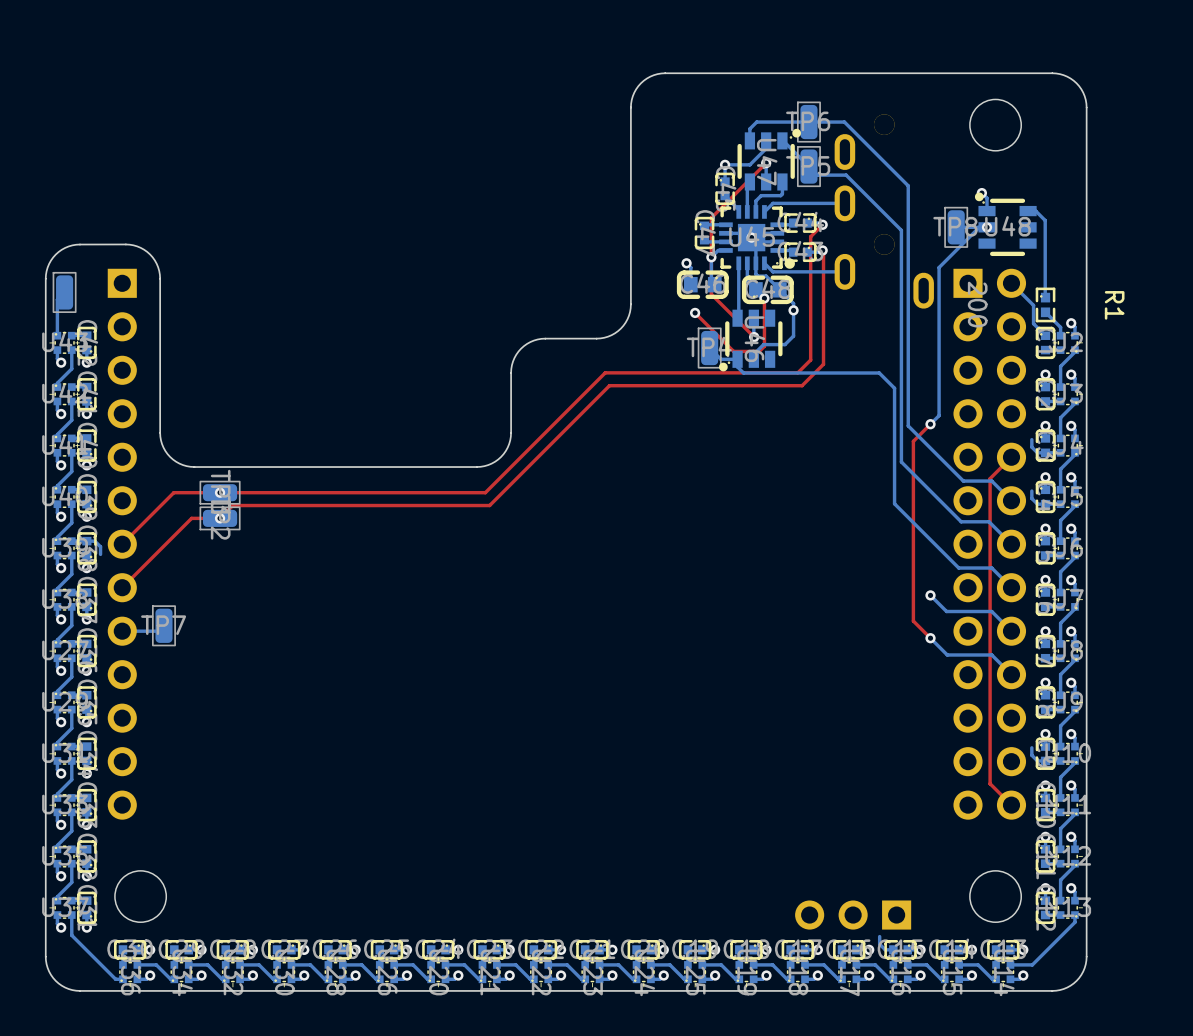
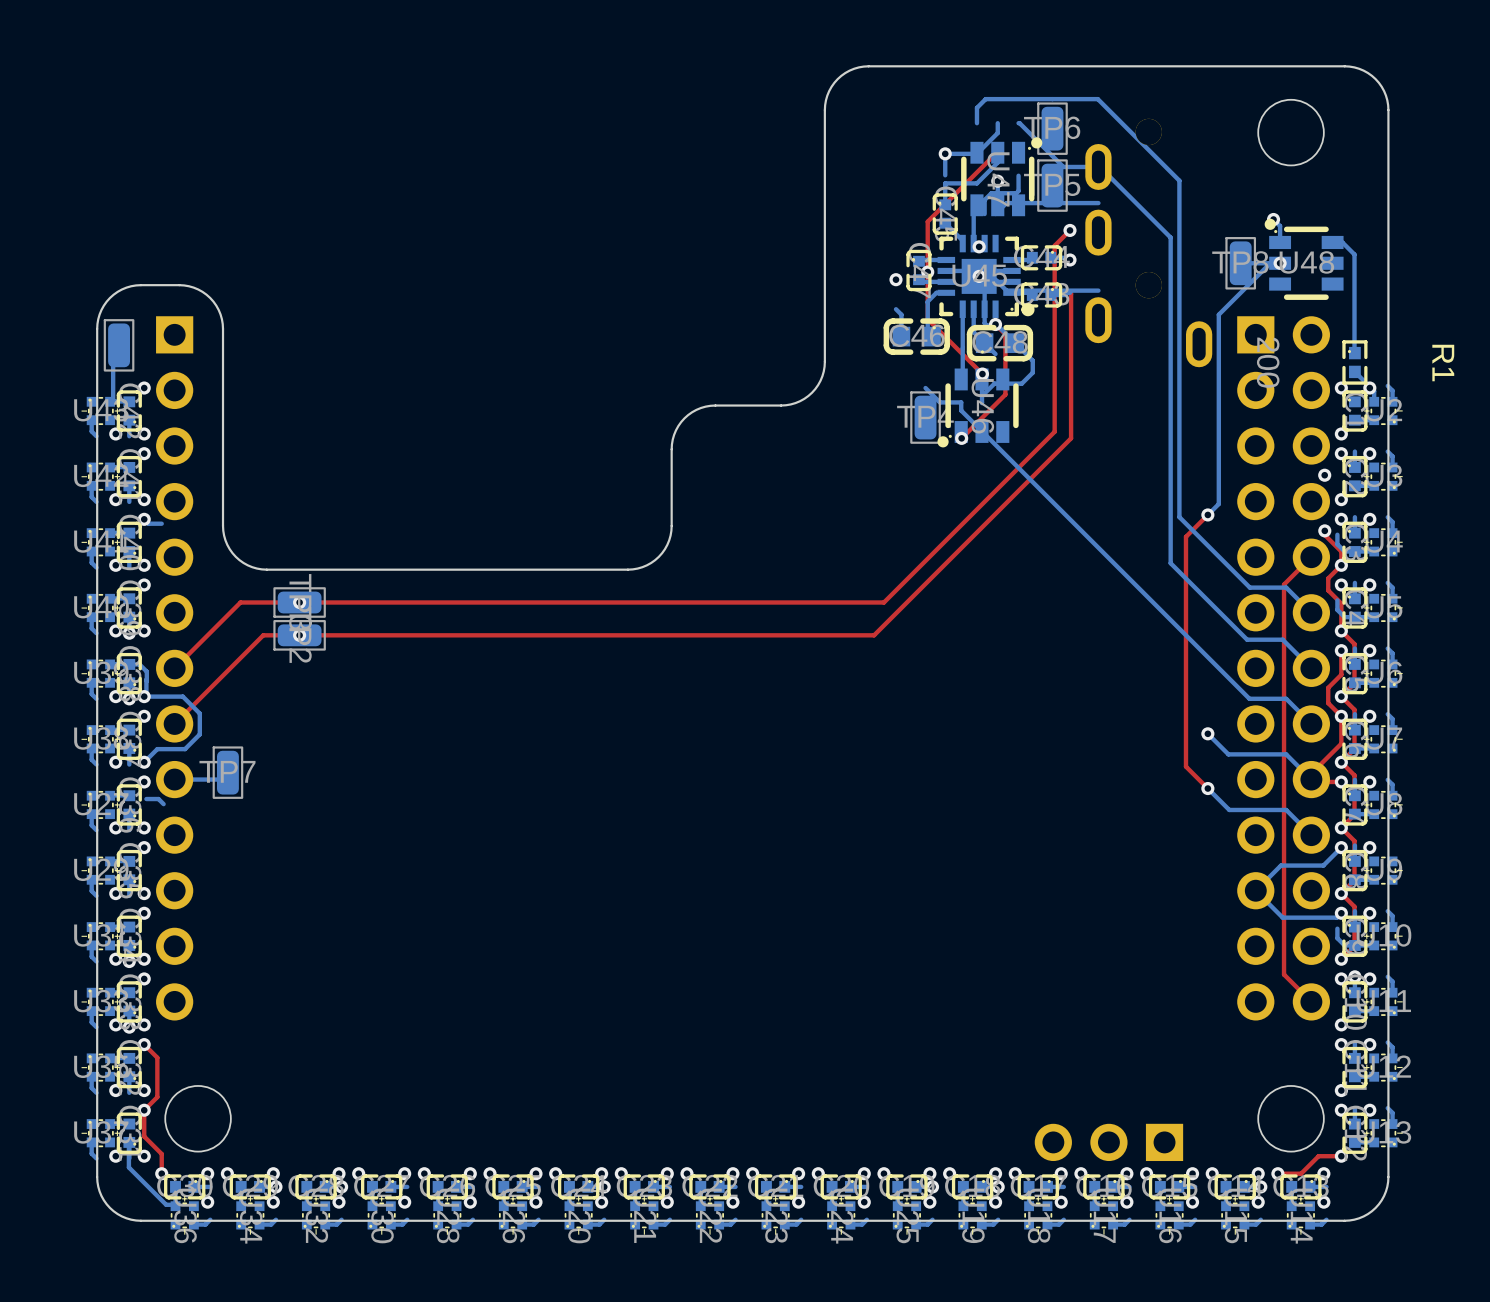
board edge: (1037, 73) (1056, 73) (1070, 78) (1083, 92) (1086, 107) (1086, 956) (1084, 968) (1079, 978) (1070, 985) (1060, 990) (79, 990) (68, 989) (58, 983) (49, 971) (45, 956) (45, 274) (53, 257) (68, 246) (79, 244) (125, 244) -> (1344, 66) (1359, 68) (1375, 79) (1384, 91) (1388, 110) (1388, 1177) (1385, 1191) (1378, 1204) (1367, 1214) (1354, 1219) (140, 1220) (126, 1218) (113, 1211) (101, 1195) (97, 1177) (97, 324) (103, 305) (109, 297) (121, 289) (136, 285) (179, 285)
bottom track: none -> (997, 123) (997, 133) (976, 153) (945, 153) (945, 175)
bottom track: (749, 140) (749, 128) (756, 122) (844, 122) (908, 185) -> (976, 123) (976, 107) (985, 99) (1097, 99) (1179, 180) (1179, 210)
bottom track: (782, 140) (817, 175) (846, 175) (901, 230) -> (1018, 123) (1063, 166) (1100, 166) (1170, 237) (1170, 267)
top track: (766, 163) (711, 217) -> (997, 151) (927, 221) (927, 251)
via position: (725, 164) -> (945, 153)
bottom track: (782, 181) (782, 193) (780, 195) (761, 195) (755, 200) (755, 211) -> (1018, 175) (1018, 191) (1016, 193) (991, 193) (984, 200) (984, 214)
via: none -> (1069, 230)
bottom track: (844, 203) (773, 203) (764, 211) -> (1098, 203) (1006, 203) (995, 214)
via: none -> (979, 246)
top track: (822, 224) (810, 236) -> (1069, 230) (1054, 245) (1054, 275)
via: none -> (927, 272)
via: none -> (896, 279)
via: (822, 250) -> none
via: (711, 257) -> none
via: (686, 263) -> none
bottom track: (764, 263) (773, 271) (844, 271) -> (995, 279) (1006, 290) (1098, 290)
top track: (711, 271) (711, 294) (754, 337) -> (927, 319) (982, 374)
top track: none -> (995, 324) (1005, 334) (1005, 394) (961, 438)
via: none -> (995, 324)
bottom track: (1011, 283) (1033, 305) (1033, 323) (1045, 335) -> none
bottom track: none -> (119, 345) (113, 351) (113, 401)
bottom track: (64, 292) (57, 299) (57, 335) -> none
part position: (64, 292) -> (119, 345)
top track: (764, 298) (764, 346) (759, 351) (733, 351) (695, 312) -> none
via: (764, 298) -> none
via: (793, 310) -> none
via: (695, 312) -> none
bottom track: (793, 312) (793, 336) (785, 344) (763, 344) (753, 354) (753, 359) -> (1032, 372) (1021, 383) (994, 383) (982, 396)
via: none -> (982, 374)
via position: (1071, 323) -> (1369, 388)
via: none -> (144, 388)
via: none -> (1341, 388)
via: (754, 337) -> none
bottom track: (709, 348) (720, 359) (737, 359) (737, 367) (743, 373) (879, 373) (894, 388) (894, 503) (958, 568) (963, 568) -> (925, 388) (939, 402) (961, 402) (961, 410) (1249, 698)
bottom track: (71, 349) (71, 368) (57, 383) (57, 386) -> none
bottom track: (1074, 350) (1060, 366) (1060, 387) -> none
top track: (810, 359) (797, 372) (605, 372) (485, 492) -> (1054, 431) (883, 602) (638, 602)
via: none -> (115, 433)
via: none -> (144, 433)
via: none -> (1341, 433)
via: (61, 362) -> none
via: (86, 362) -> none
via: none -> (961, 438)
via: (1045, 374) -> none
via: (1071, 374) -> none
via: none -> (144, 453)
via: none -> (1341, 453)
via: none -> (1369, 453)
top track: (802, 385) (609, 385) (489, 505) (232, 505) (220, 518) -> (1043, 465) (874, 635) (299, 635)
via: none -> (1324, 475)
bottom track: (71, 401) (71, 420) (57, 434) (57, 438) -> none
bottom track: (1074, 401) (1060, 417) (1060, 438) -> none
via: none -> (115, 499)
via: none -> (144, 499)
via: none -> (1341, 499)
via: (61, 414) -> none
via: (86, 414) -> none
via: (1045, 425) -> none
via: (1071, 425) -> none
bottom track: none -> (144, 519) (148, 523) (161, 523)
via: none -> (144, 519)
via: none -> (1341, 519)
via: none -> (1369, 519)
via: none -> (1324, 530)
top track: none -> (1324, 531) (1324, 535) (1341, 551) (1341, 565) (1328, 578) (1328, 590) (1341, 603) (1341, 630) (1354, 644) (1354, 683) (1341, 696) (1354, 709) (1354, 749) (1341, 762) (1354, 775) (1354, 814) (1341, 827) (1354, 841) (1354, 880) (1341, 893) (1354, 906) (1354, 946) (1341, 959)
bottom track: (71, 452) (71, 471) (57, 485) (57, 489) -> none
bottom track: (1074, 452) (1060, 469) (1060, 489) -> none
via: none -> (115, 565)
via: none -> (144, 565)
via: none -> (1341, 565)
via: (61, 465) -> none
via: (86, 465) -> none
via: (1045, 477) -> none
via: (1071, 477) -> none
via: none -> (144, 584)
via: none -> (1341, 584)
via: none -> (1369, 584)
bottom track: (71, 503) (71, 522) (57, 537) (57, 540) -> none
bottom track: (1074, 504) (1060, 520) (1060, 541) -> none
via: none -> (144, 630)
via: none -> (1341, 630)
via position: (61, 516) -> (115, 630)
via: (1045, 528) -> none
via: (1071, 528) -> none
top track: none -> (1341, 650) (1341, 674) (1328, 687) (1328, 703) (1341, 716) (1341, 743) (1311, 773) (1311, 779) (1313, 781) (1341, 781)
via: none -> (1341, 650)
via: none -> (1369, 650)
bottom track: none -> (146, 679) (146, 694) (144, 696) (182, 696) (199, 713) (199, 734) (185, 749) (157, 749) (144, 762)
bottom track: (71, 555) (71, 574) (57, 588) (57, 592) -> none
bottom track: (1074, 555) (1060, 571) (1060, 592) -> none
via: none -> (144, 696)
via: none -> (1341, 696)
via position: (61, 568) -> (115, 696)
via: (1045, 580) -> none
via: (1071, 580) -> none
via: none -> (144, 716)
via: none -> (1341, 716)
via: none -> (1369, 716)
bottom track: (71, 606) (71, 625) (57, 640) (57, 643) -> none
bottom track: (1074, 606) (1060, 623) (1060, 643) -> none
via: none -> (115, 762)
via: none -> (144, 762)
via: none -> (1341, 762)
via: (61, 619) -> none
via: (86, 619) -> none
via: (1045, 631) -> none
via: (1071, 631) -> none
via: none -> (144, 781)
via: none -> (1341, 781)
via: none -> (1369, 781)
bottom track: none -> (146, 799) (158, 799) (163, 804)
bottom track: (71, 657) (71, 676) (57, 691) (57, 694) -> none
bottom track: (1074, 658) (1060, 674) (1060, 695) -> none
via: none -> (115, 827)
via: none -> (144, 827)
via: none -> (1341, 827)
via: (61, 670) -> none
via: (86, 670) -> none
via: (1045, 682) -> none
bottom track: (1071, 682) (1074, 686) (1074, 695) -> none
via: (1071, 682) -> none
via: none -> (144, 847)
bottom track: none -> (1341, 847) (1323, 865) (1280, 865) (1255, 890) (1282, 917) (1336, 917) (1341, 913)
via: none -> (1341, 847)
via: none -> (1369, 847)
bottom track: (71, 709) (71, 728) (57, 742) (57, 746) -> none
bottom track: (1074, 709) (1060, 725) (1060, 746) -> none
via: none -> (115, 893)
via: none -> (144, 893)
via: none -> (1341, 893)
via: (61, 722) -> none
via: (86, 722) -> none
via: (1045, 734) -> none
via: (1071, 734) -> none
via: none -> (144, 913)
via: none -> (1341, 913)
via: none -> (1369, 913)
bottom track: (71, 760) (71, 779) (57, 794) (57, 797) -> none
bottom track: (1074, 760) (1060, 777) (1060, 797) -> none
via: none -> (144, 959)
via: none -> (1341, 959)
via position: (61, 773) -> (115, 959)
via position: (1071, 785) -> (1369, 978)
via: none -> (144, 978)
via: none -> (1341, 978)
bottom track: (71, 812) (71, 831) (57, 845) (57, 849) -> none
bottom track: (1074, 812) (1060, 828) (1060, 849) -> none
via: none -> (144, 1024)
via: none -> (1341, 1024)
via position: (61, 824) -> (115, 1024)
via: (1045, 836) -> none
via: (1071, 836) -> none
top track: none -> (144, 1044) (157, 1057) (157, 1097) (144, 1110) (144, 1136) (161, 1154) (161, 1173)
via: none -> (144, 1044)
via: none -> (1341, 1044)
via: none -> (1369, 1044)
bottom track: (71, 863) (71, 882) (57, 896) (57, 900) -> none
bottom track: (1074, 863) (1060, 880) (1060, 900) -> none
via: none -> (115, 1090)
via: none -> (144, 1090)
via: none -> (1341, 1090)
via: (61, 876) -> none
via: (86, 876) -> none
via: (1045, 888) -> none
via: (1071, 888) -> none
via: none -> (144, 1110)
via: none -> (1341, 1110)
via: none -> (1369, 1110)
bottom track: (71, 915) (71, 935) (115, 979) (122, 979) -> none
bottom track: none -> (131, 1142) (128, 1145) (128, 1167) (166, 1204) (175, 1204)
bottom track: (1074, 915) (1074, 922) (1032, 964) (1010, 964) -> none
via: none -> (115, 1156)
via: none -> (144, 1156)
top track: none -> (1341, 1156) (1318, 1156) (1301, 1173) (1277, 1173)
via: none -> (1341, 1156)
via: (61, 927) -> none
via: (86, 927) -> none
bottom track: (879, 936) (879, 944) (885, 949) (893, 949) (893, 964) -> none
via: none -> (161, 1173)
via: none -> (207, 1173)
via: none -> (227, 1173)
via: none -> (273, 1173)
via: none -> (339, 1173)
via: none -> (358, 1173)
via: none -> (404, 1173)
via: none -> (424, 1173)
via: none -> (470, 1173)
via: none -> (490, 1173)
via: none -> (535, 1173)
via: none -> (555, 1173)
via: none -> (601, 1173)
via: none -> (621, 1173)
via: none -> (667, 1173)
via: none -> (686, 1173)
via: none -> (732, 1173)
via: none -> (752, 1173)
via: none -> (798, 1173)
via: none -> (818, 1173)
via: none -> (864, 1173)
via: none -> (883, 1173)
via: none -> (929, 1173)
via: none -> (949, 1173)
via: none -> (995, 1173)
via: none -> (1015, 1173)
via: none -> (1061, 1173)
via: none -> (1080, 1173)
via: none -> (1126, 1173)
via: none -> (1146, 1173)
via: none -> (1192, 1173)
via: none -> (1212, 1173)
via: none -> (1258, 1173)
via: none -> (1277, 1173)
via: none -> (1323, 1173)
via: (150, 949) -> none
via: (304, 949) -> none
via: (355, 949) -> none
via: (406, 949) -> none
via: (509, 949) -> none
via: (561, 949) -> none
via: (612, 949) -> none
via: (663, 949) -> none
via: (817, 949) -> none
via: (869, 949) -> none
via: (920, 949) -> none
via: (1023, 949) -> none
via: none -> (207, 1202)
via: none -> (404, 1202)
via: none -> (470, 1202)
via: none -> (535, 1202)
via: none -> (667, 1202)
via: none -> (732, 1202)
via: none -> (798, 1202)
via: none -> (864, 1202)
via: none -> (1061, 1202)
via: none -> (1126, 1202)
via: none -> (1192, 1202)
via: none -> (1323, 1202)
bottom track: (137, 964) (156, 964) (170, 979) (174, 979) -> none
bottom track: (188, 964) (207, 964) (222, 979) (225, 979) -> none
bottom track: (240, 964) (259, 964) (273, 979) (277, 979) -> none
bottom track: (291, 964) (310, 964) (324, 979) (328, 979) -> none
bottom track: (342, 964) (361, 964) (376, 979) (379, 979) -> none
bottom track: (394, 964) (413, 964) (427, 979) (431, 979) -> none
bottom track: (445, 964) (464, 964) (478, 979) (482, 979) -> none
bottom track: (496, 964) (515, 964) (530, 979) (533, 979) -> none
bottom track: (548, 964) (567, 964) (581, 979) (585, 979) -> none
bottom track: (599, 964) (618, 964) (632, 979) (636, 979) -> none
bottom track: (650, 964) (669, 964) (684, 979) (687, 979) -> none
bottom track: (702, 964) (721, 964) (735, 979) (739, 979) -> none
bottom track: (753, 964) (772, 964) (787, 979) (790, 979) -> none
bottom track: (805, 964) (824, 964) (838, 979) (842, 979) -> none
bottom track: (856, 964) (875, 964) (889, 979) (893, 979) -> none
bottom track: (907, 964) (926, 964) (941, 979) (944, 979) -> none
bottom track: (959, 964) (978, 964) (992, 979) (996, 979) -> none
via: (150, 975) -> none
via position: (201, 975) -> (273, 1202)
via position: (252, 975) -> (339, 1202)
via: (304, 975) -> none
via: (355, 975) -> none
via: (406, 975) -> none
via position: (458, 975) -> (601, 1202)
via: (509, 975) -> none
via: (561, 975) -> none
via: (612, 975) -> none
via: (663, 975) -> none
via position: (715, 975) -> (929, 1202)
via position: (766, 975) -> (995, 1202)
via: (817, 975) -> none
via: (869, 975) -> none
via: (920, 975) -> none
via position: (971, 975) -> (1258, 1202)
via: (1023, 975) -> none

